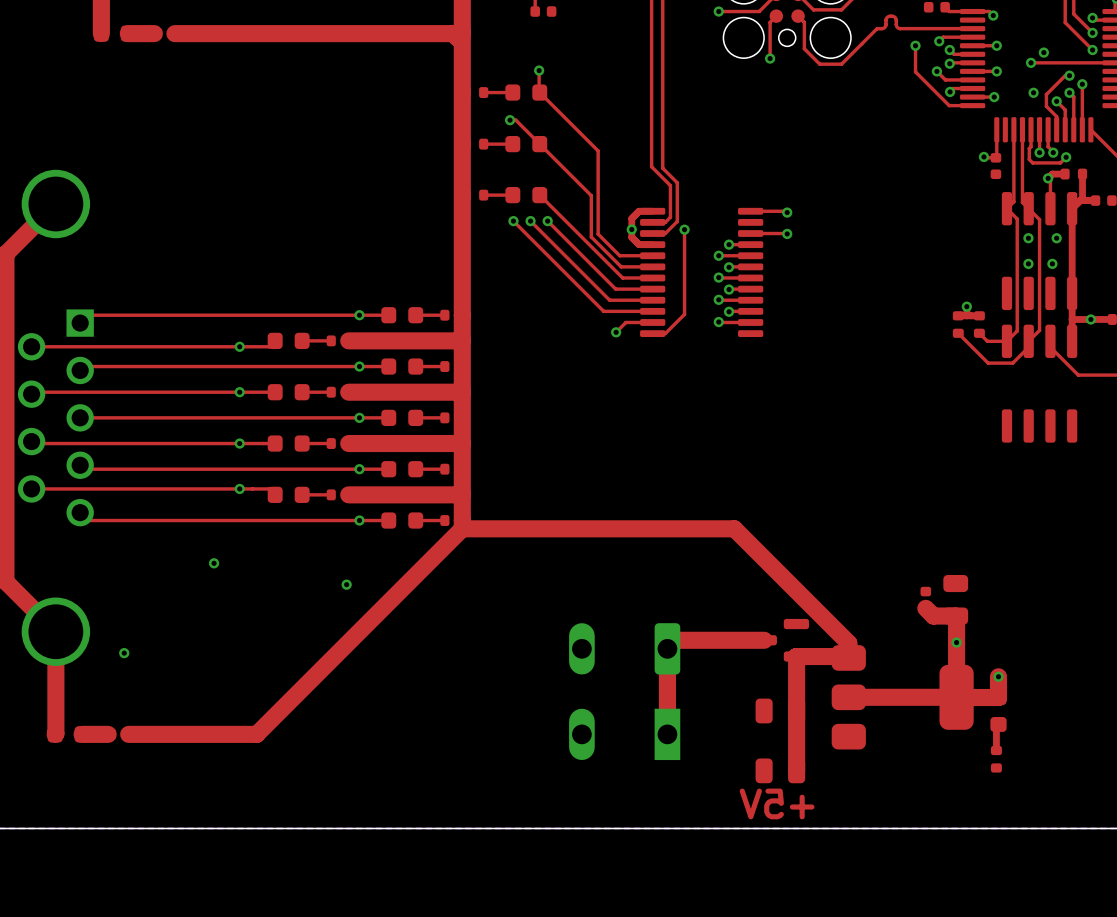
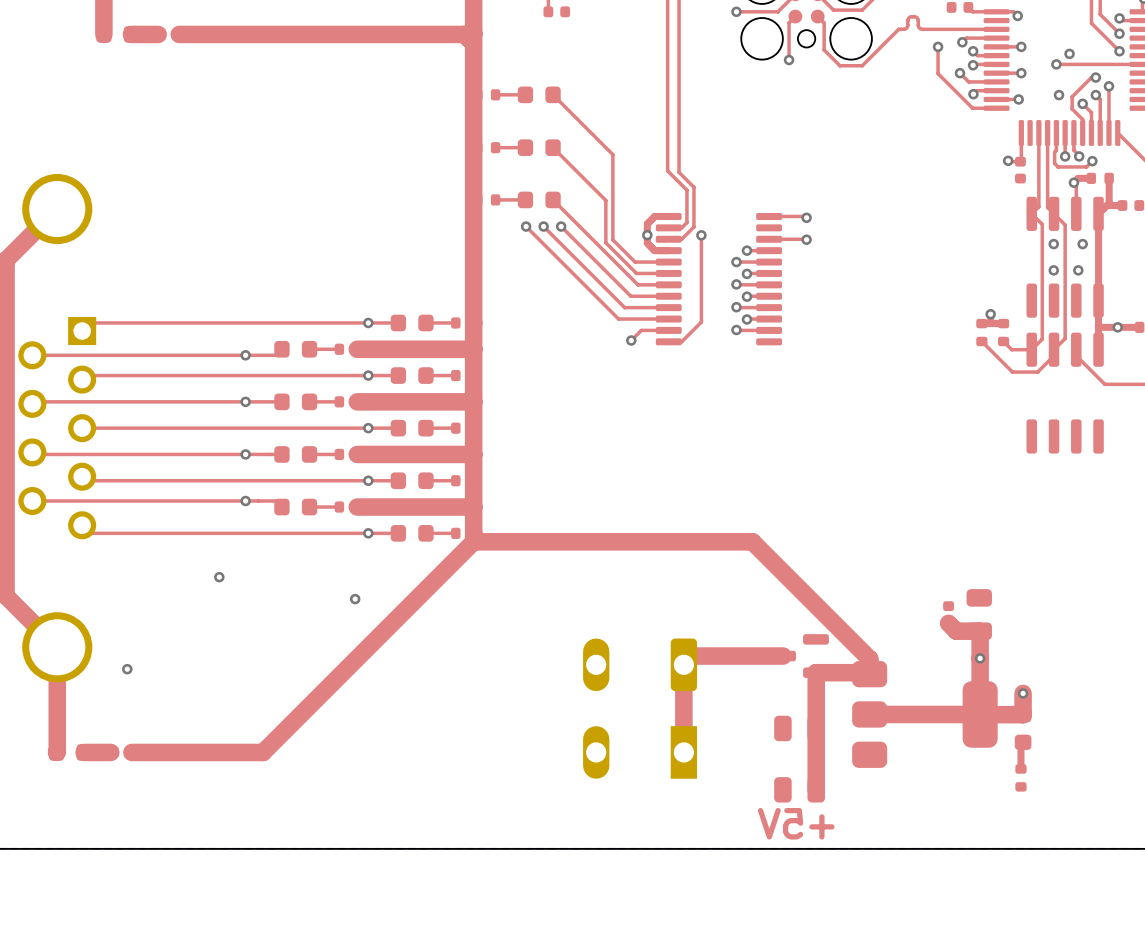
top track: (539, 70) (539, 92) -> none
via: (539, 70) -> none
top track: (510, 120) (515, 120) (539, 144) -> none
via: (510, 120) -> none

